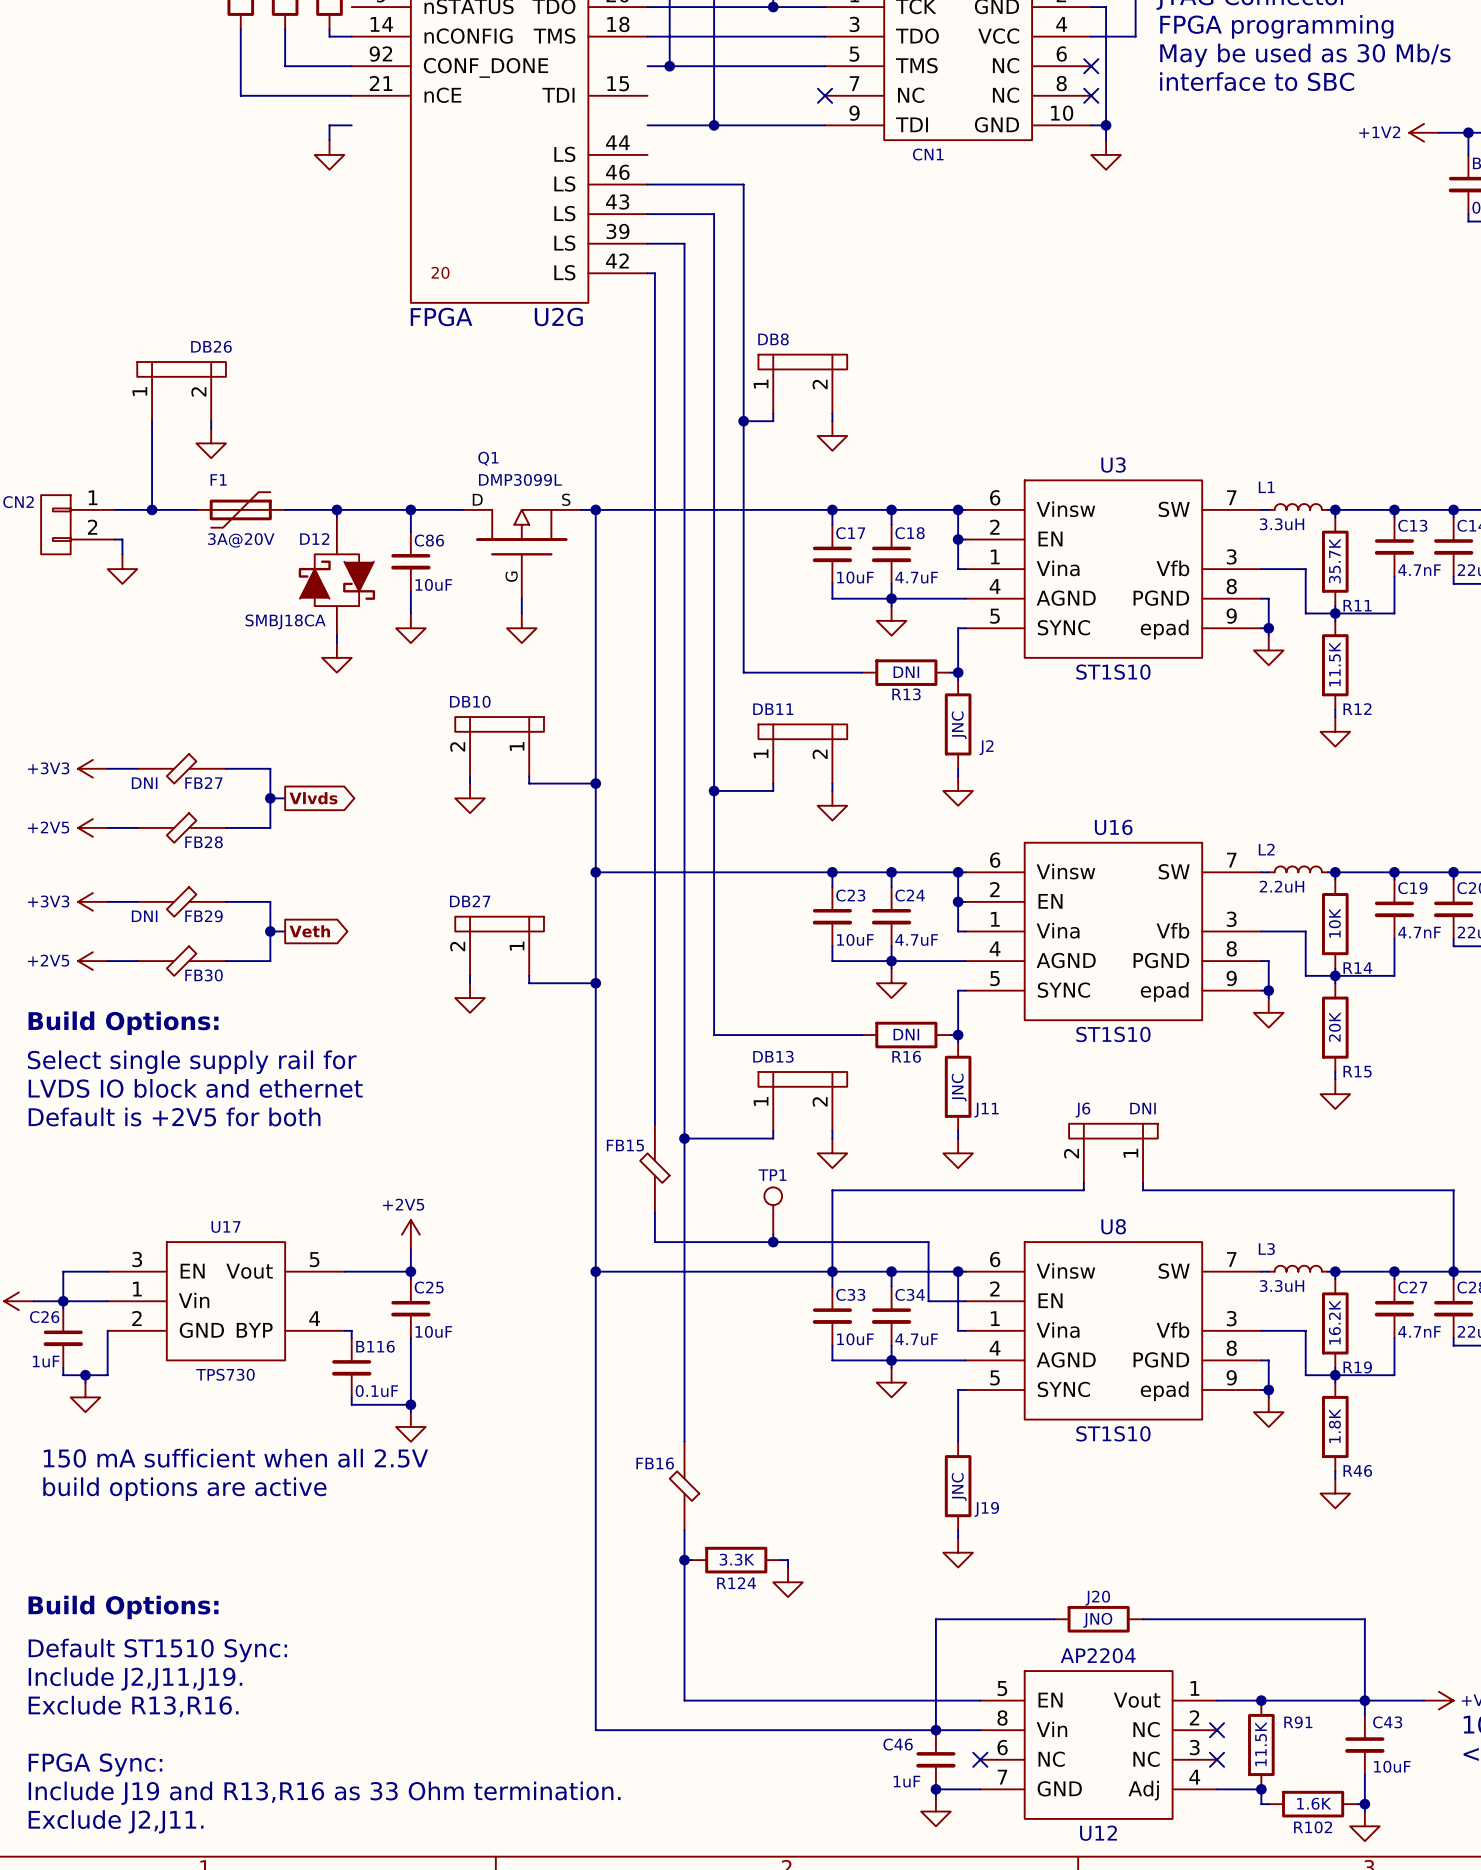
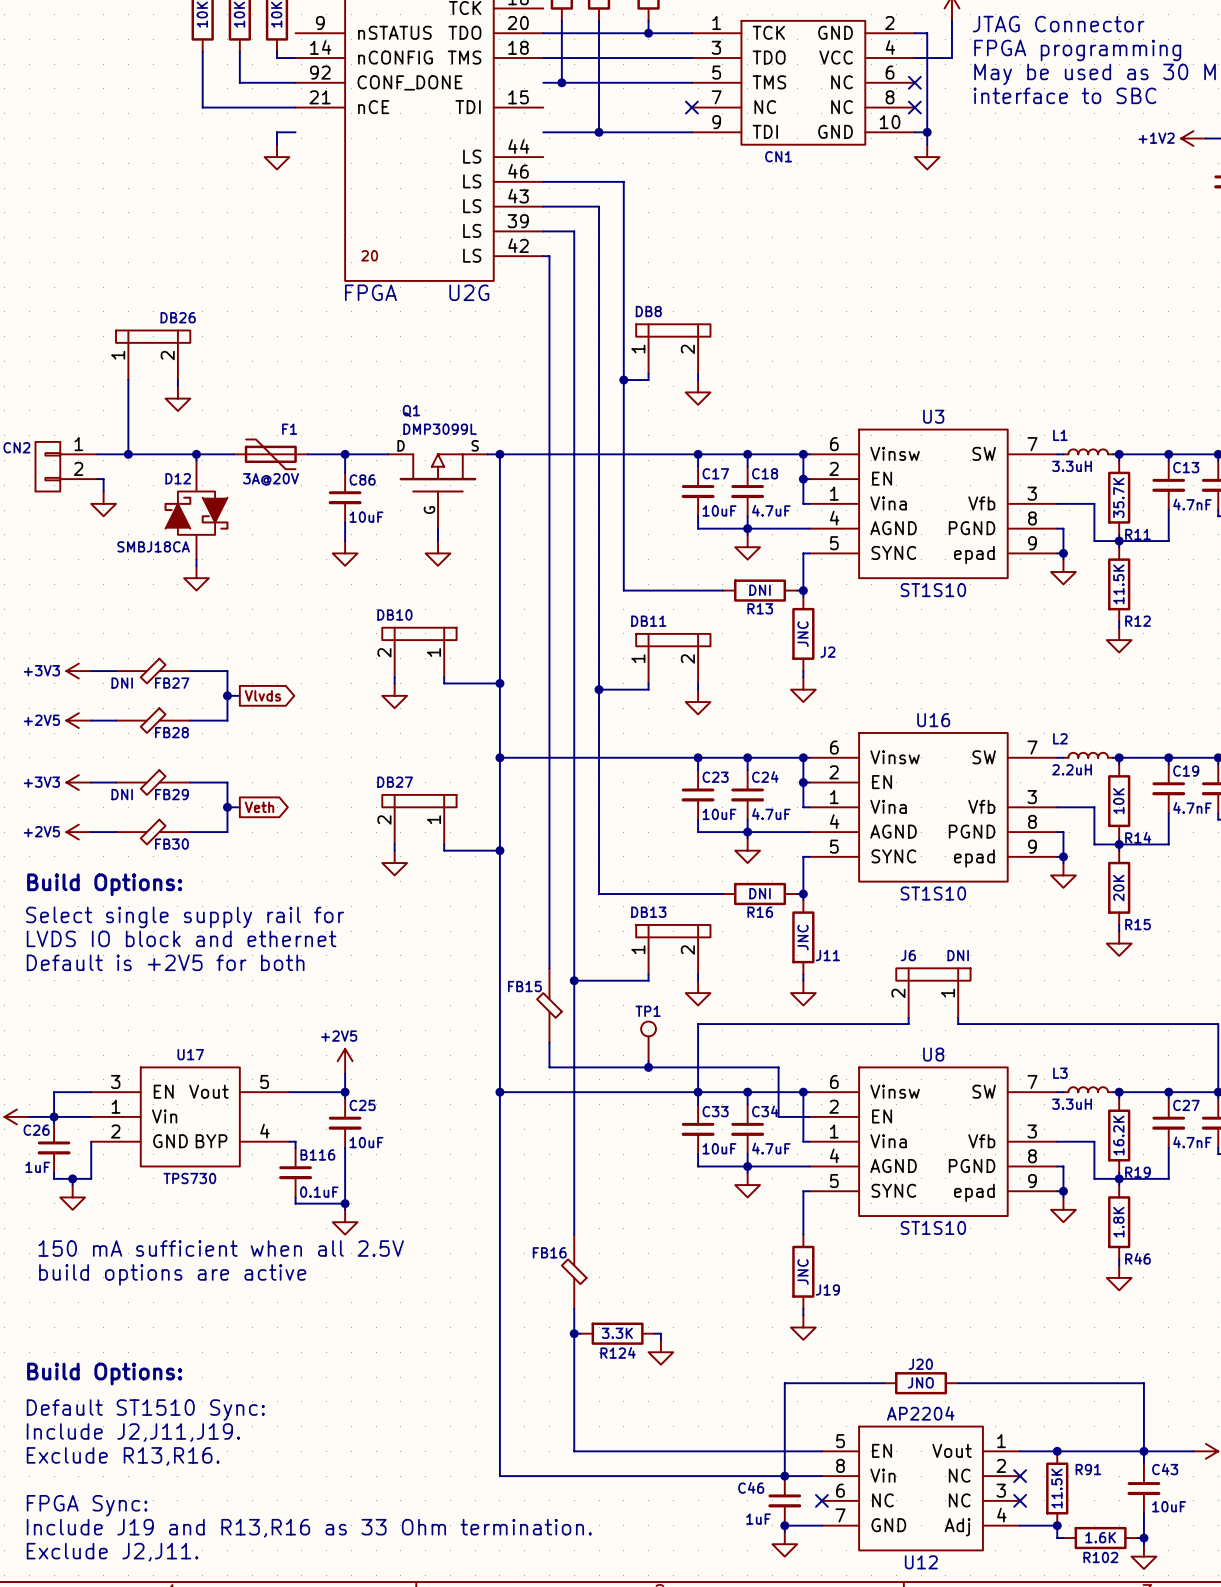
junction: none -> (196, 454)
F1 flip: as is (240, 509) -> left-right (270, 454)
F1 position: (240, 509) -> (270, 454)
junction: (336, 509) -> none
D12 position: (336, 576) -> (196, 510)
wire: (336, 635) (336, 643) -> (196, 559) (196, 565)
power symbol position: (336, 657) -> (196, 578)

